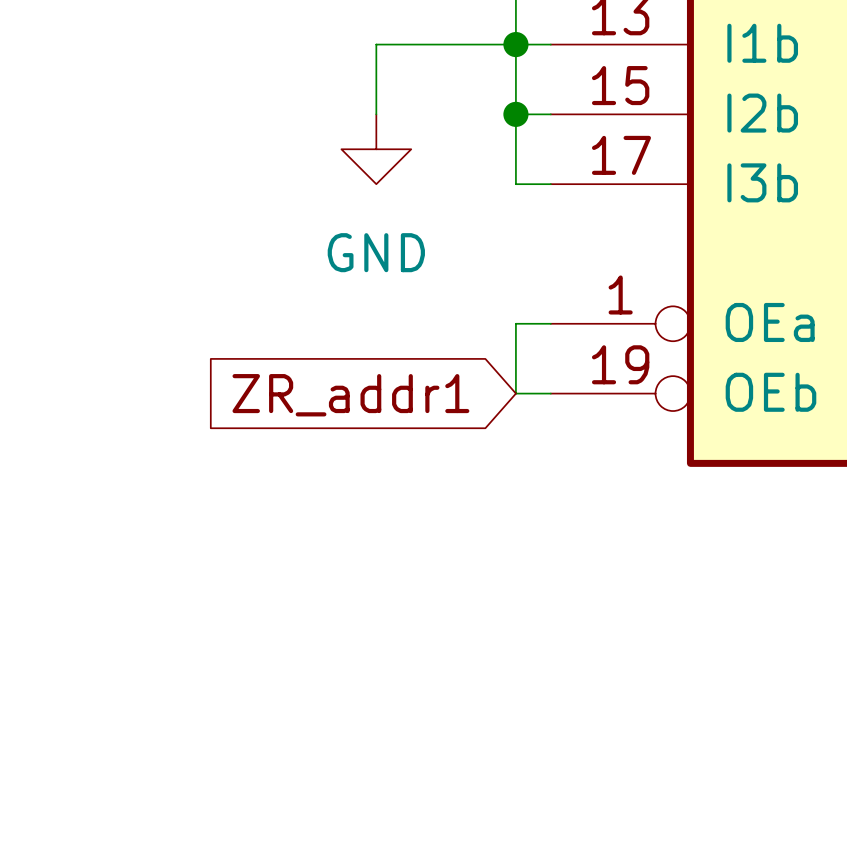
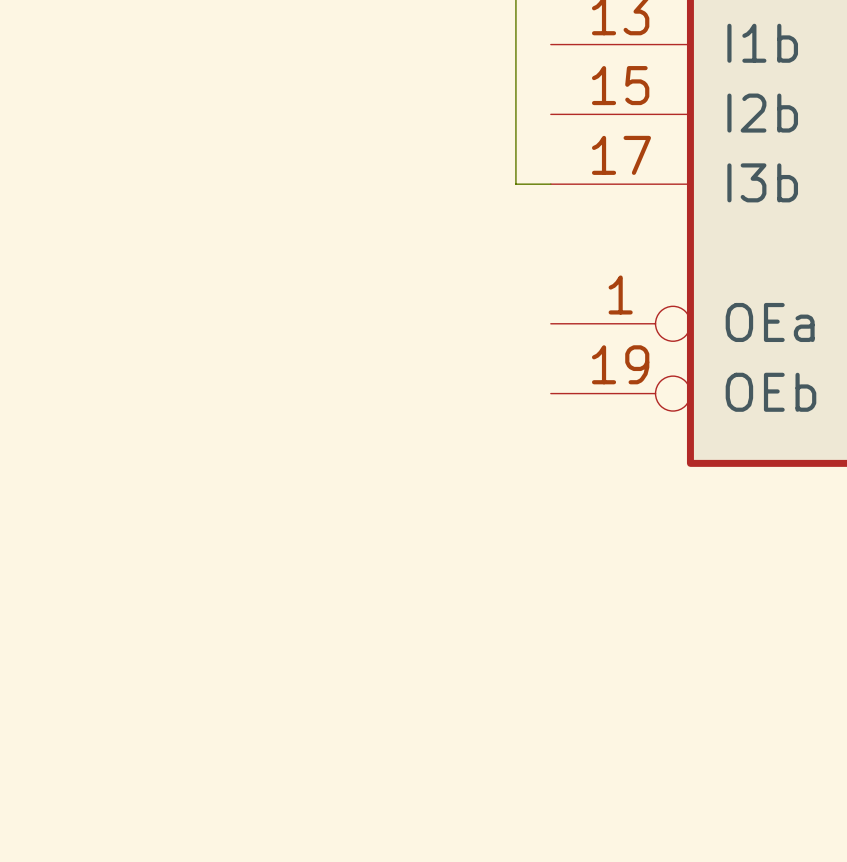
junction: (515, 44) -> none
wire: (550, 44) (376, 44) (376, 114) -> none
wire: (515, 114) (550, 114) -> none
junction: (515, 114) -> none
power symbol: GND (376, 149) -> none
wire: (550, 323) (515, 323) (515, 393) (550, 393) -> none
global label: ZR_addr1 (350, 395) -> none

